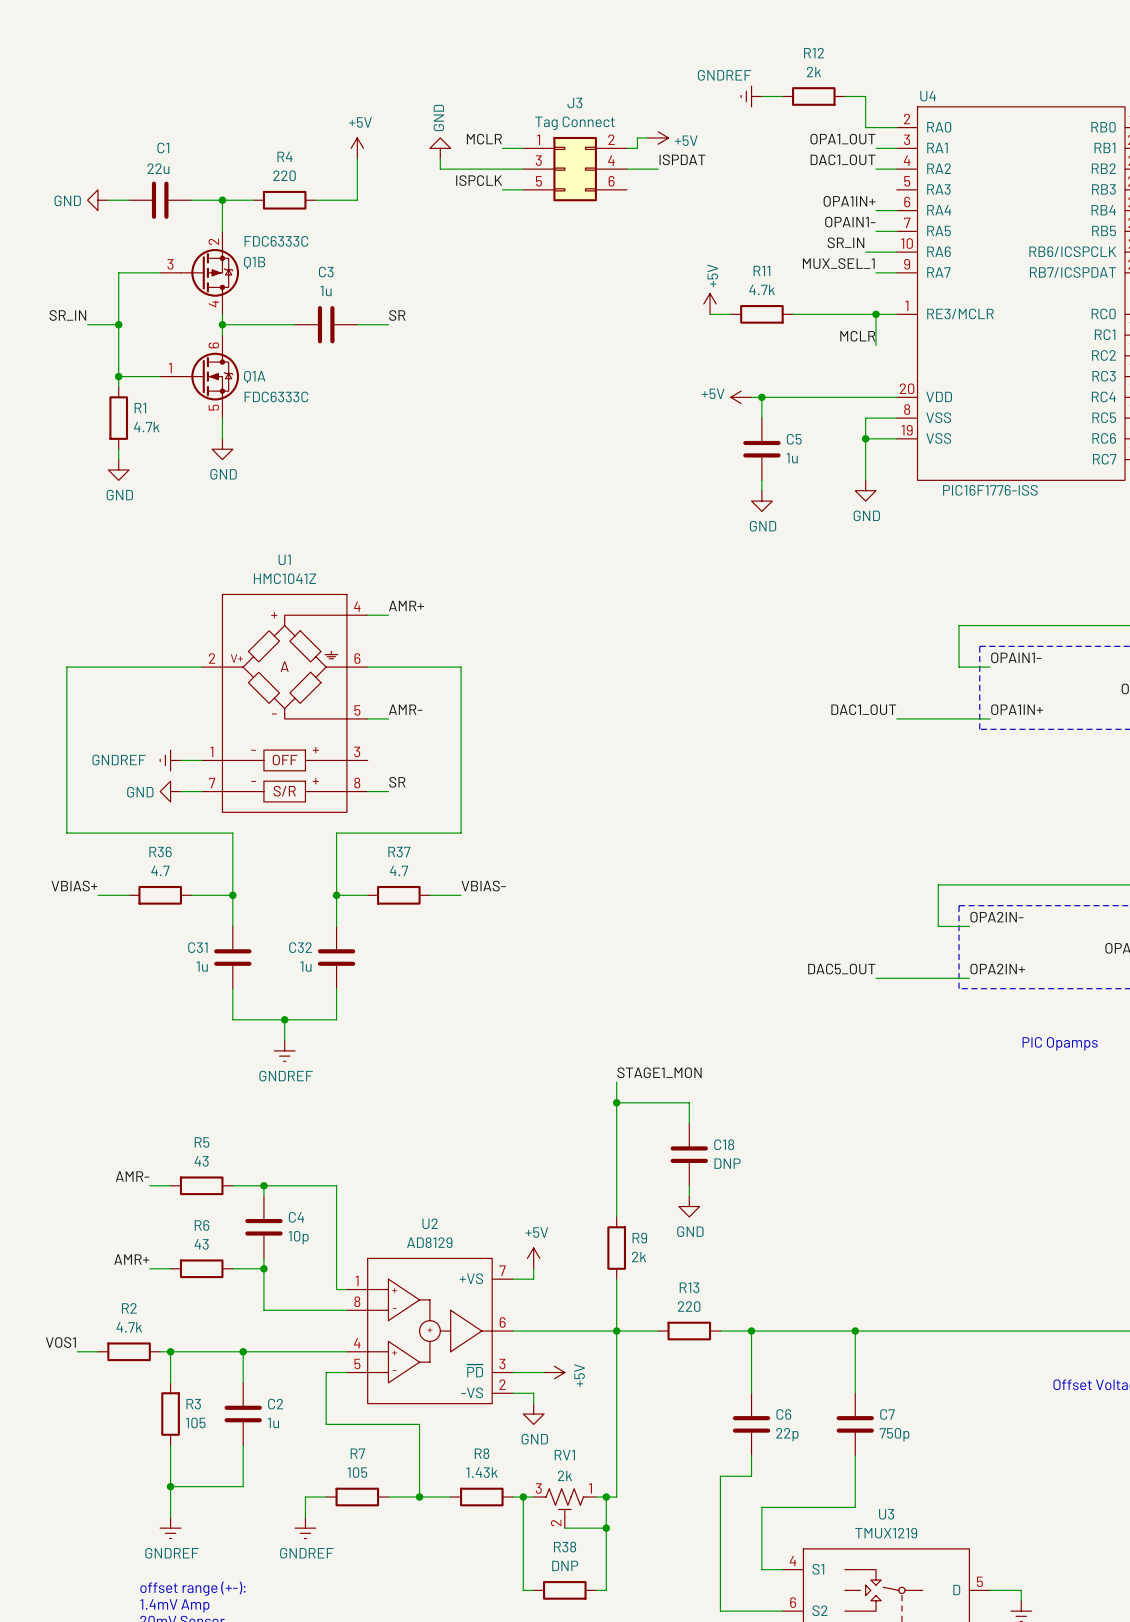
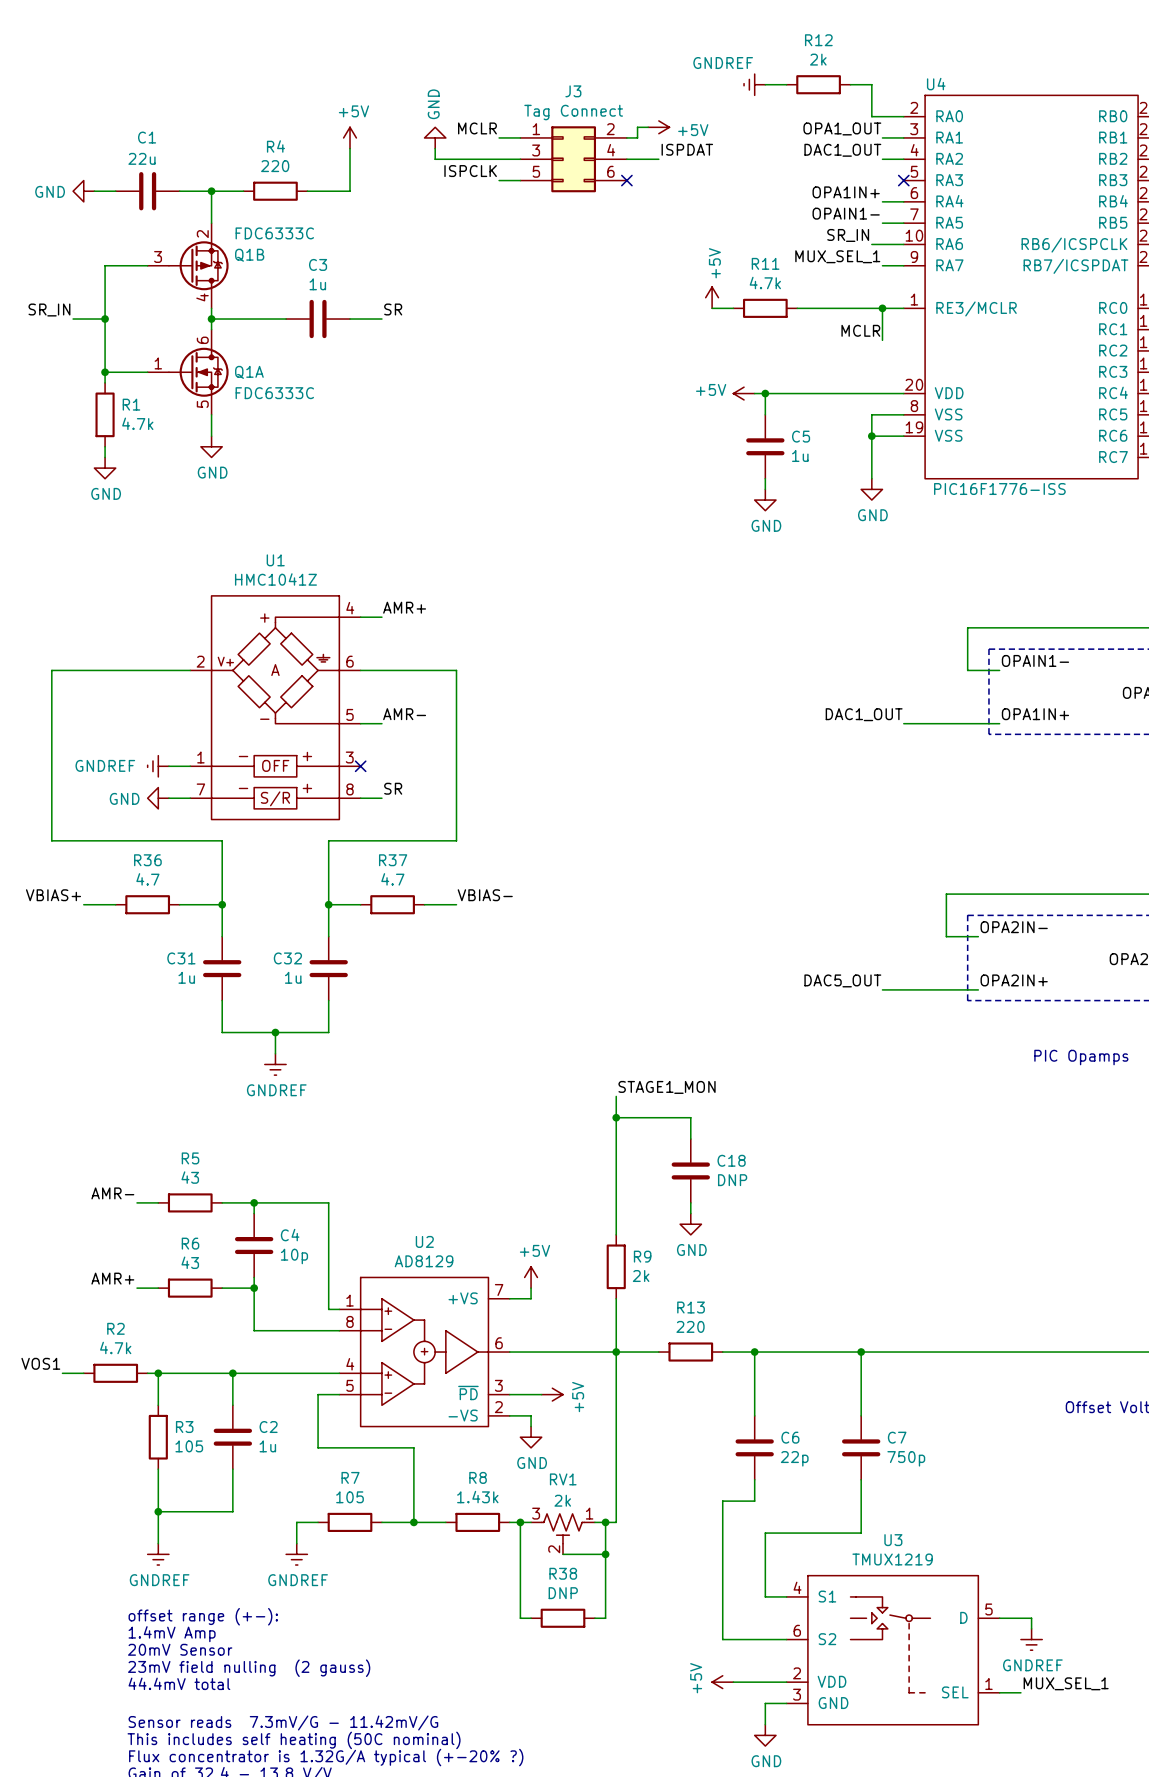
no-connect mark: none -> (626, 180)
no-connect mark: none -> (903, 180)
no-connect mark: none -> (360, 766)

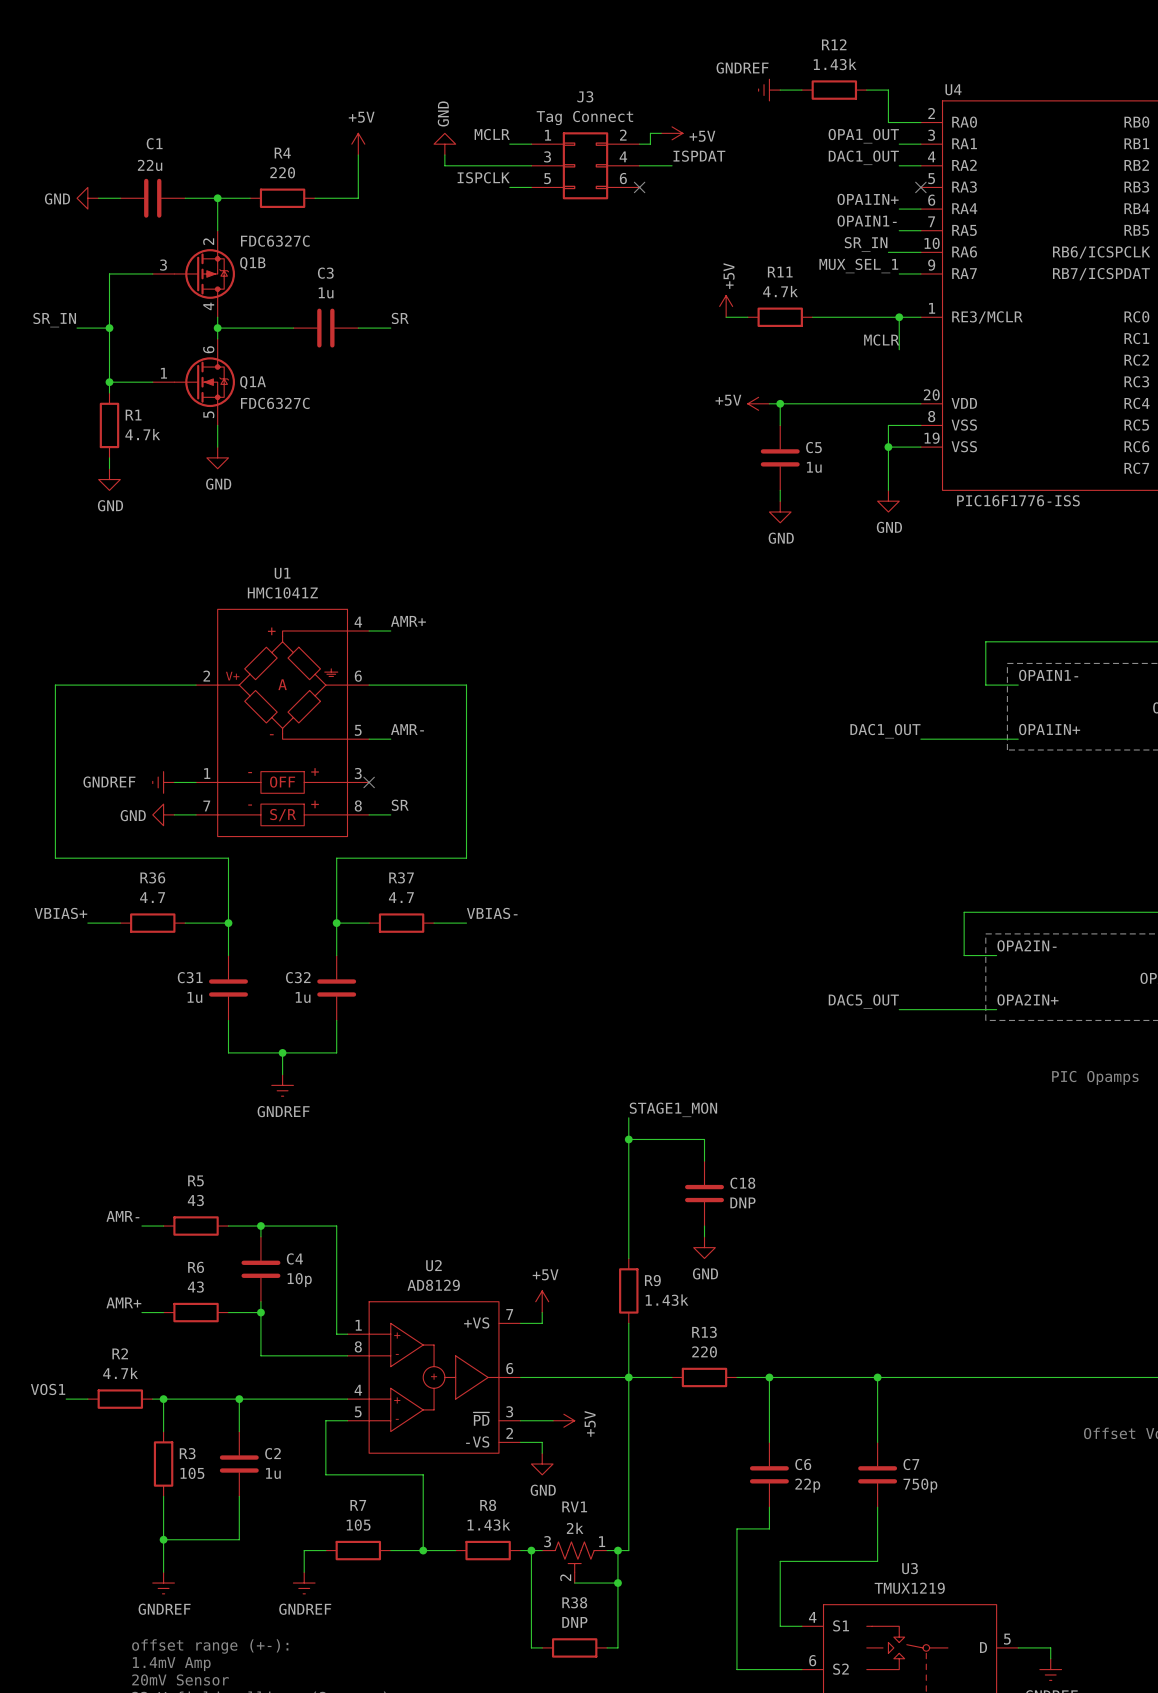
R12 value: 2k (818, 59) -> 1.43k (835, 64)
Q1B value: FDC6333C (274, 233) -> FDC6327C (275, 241)
Q1A value: FDC6333C (274, 393) -> FDC6327C (275, 403)
R9 value: 2k (641, 1276) -> 1.43k (667, 1300)

